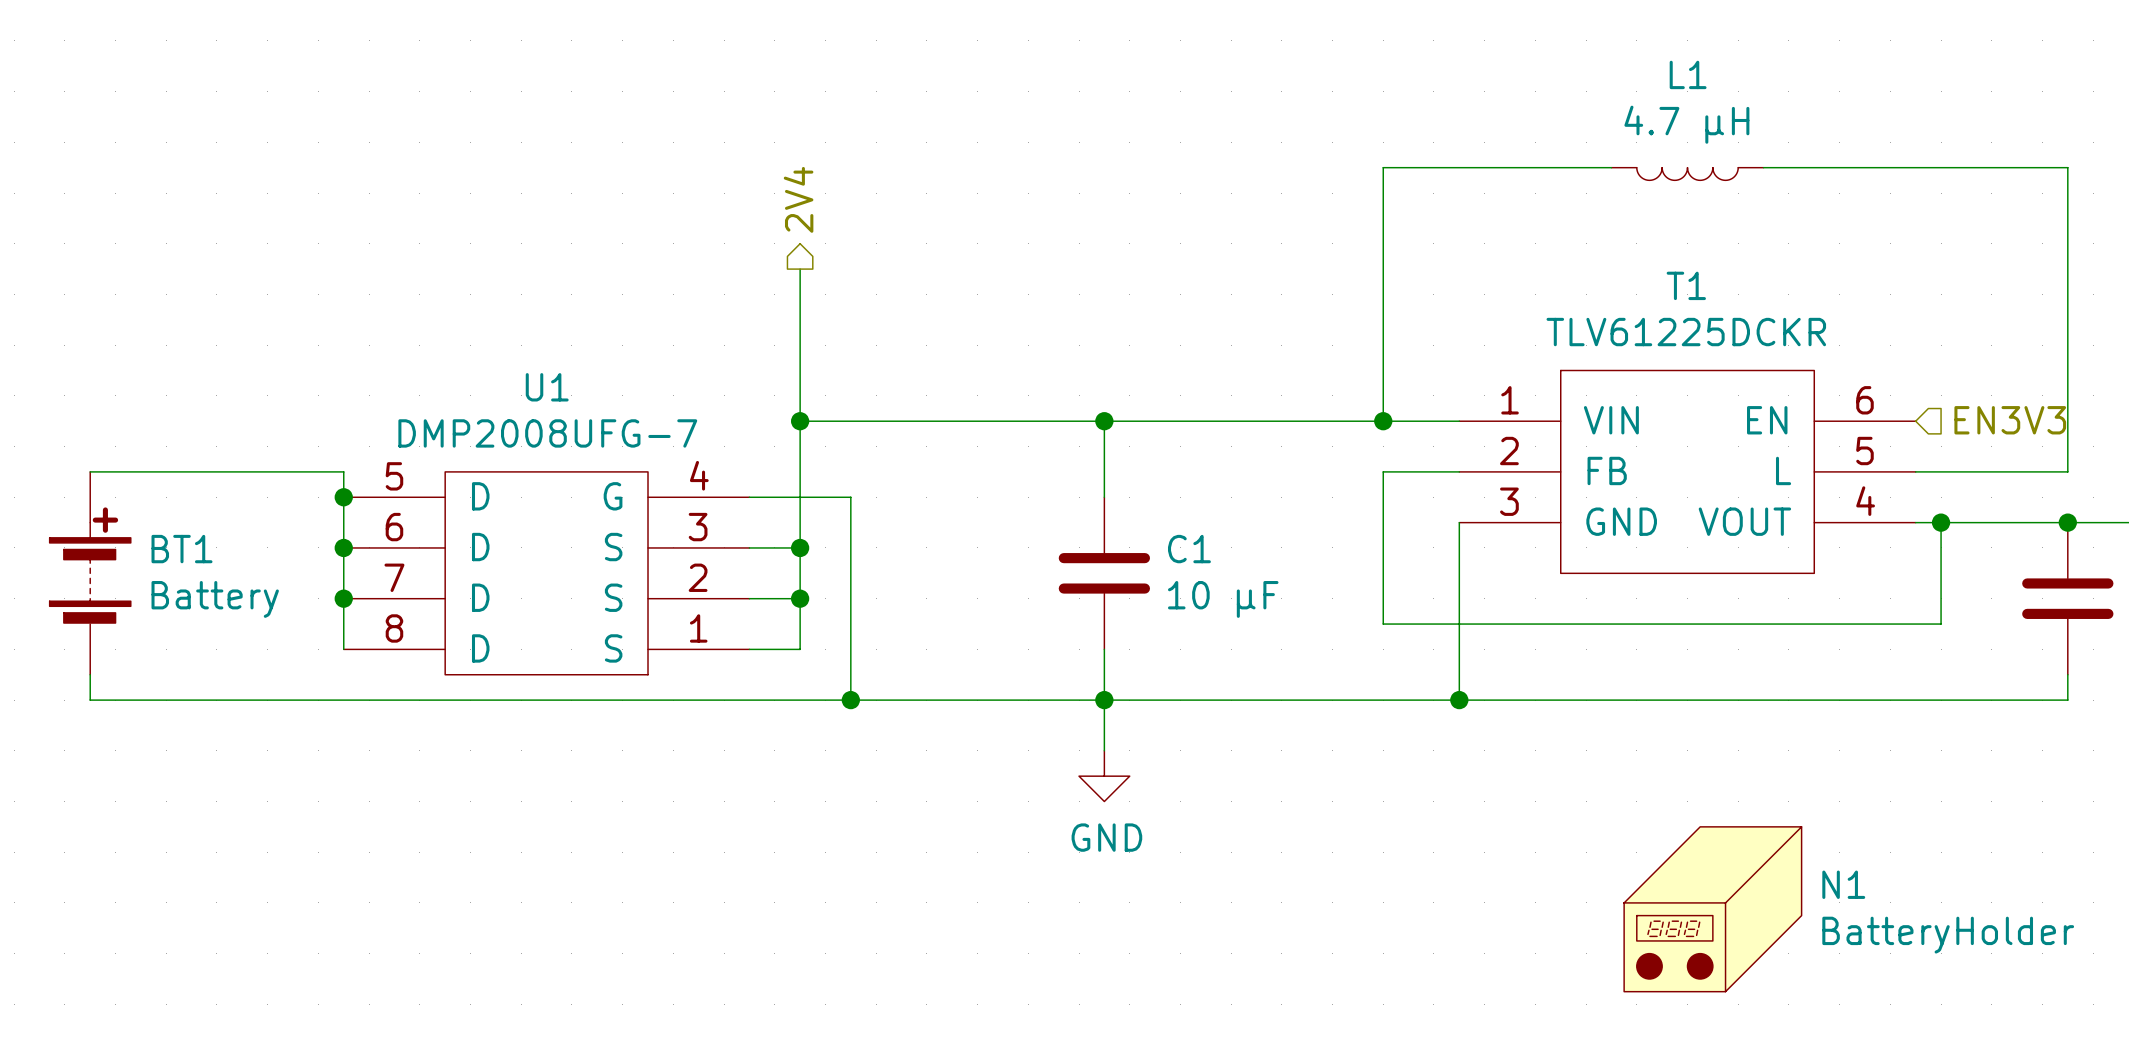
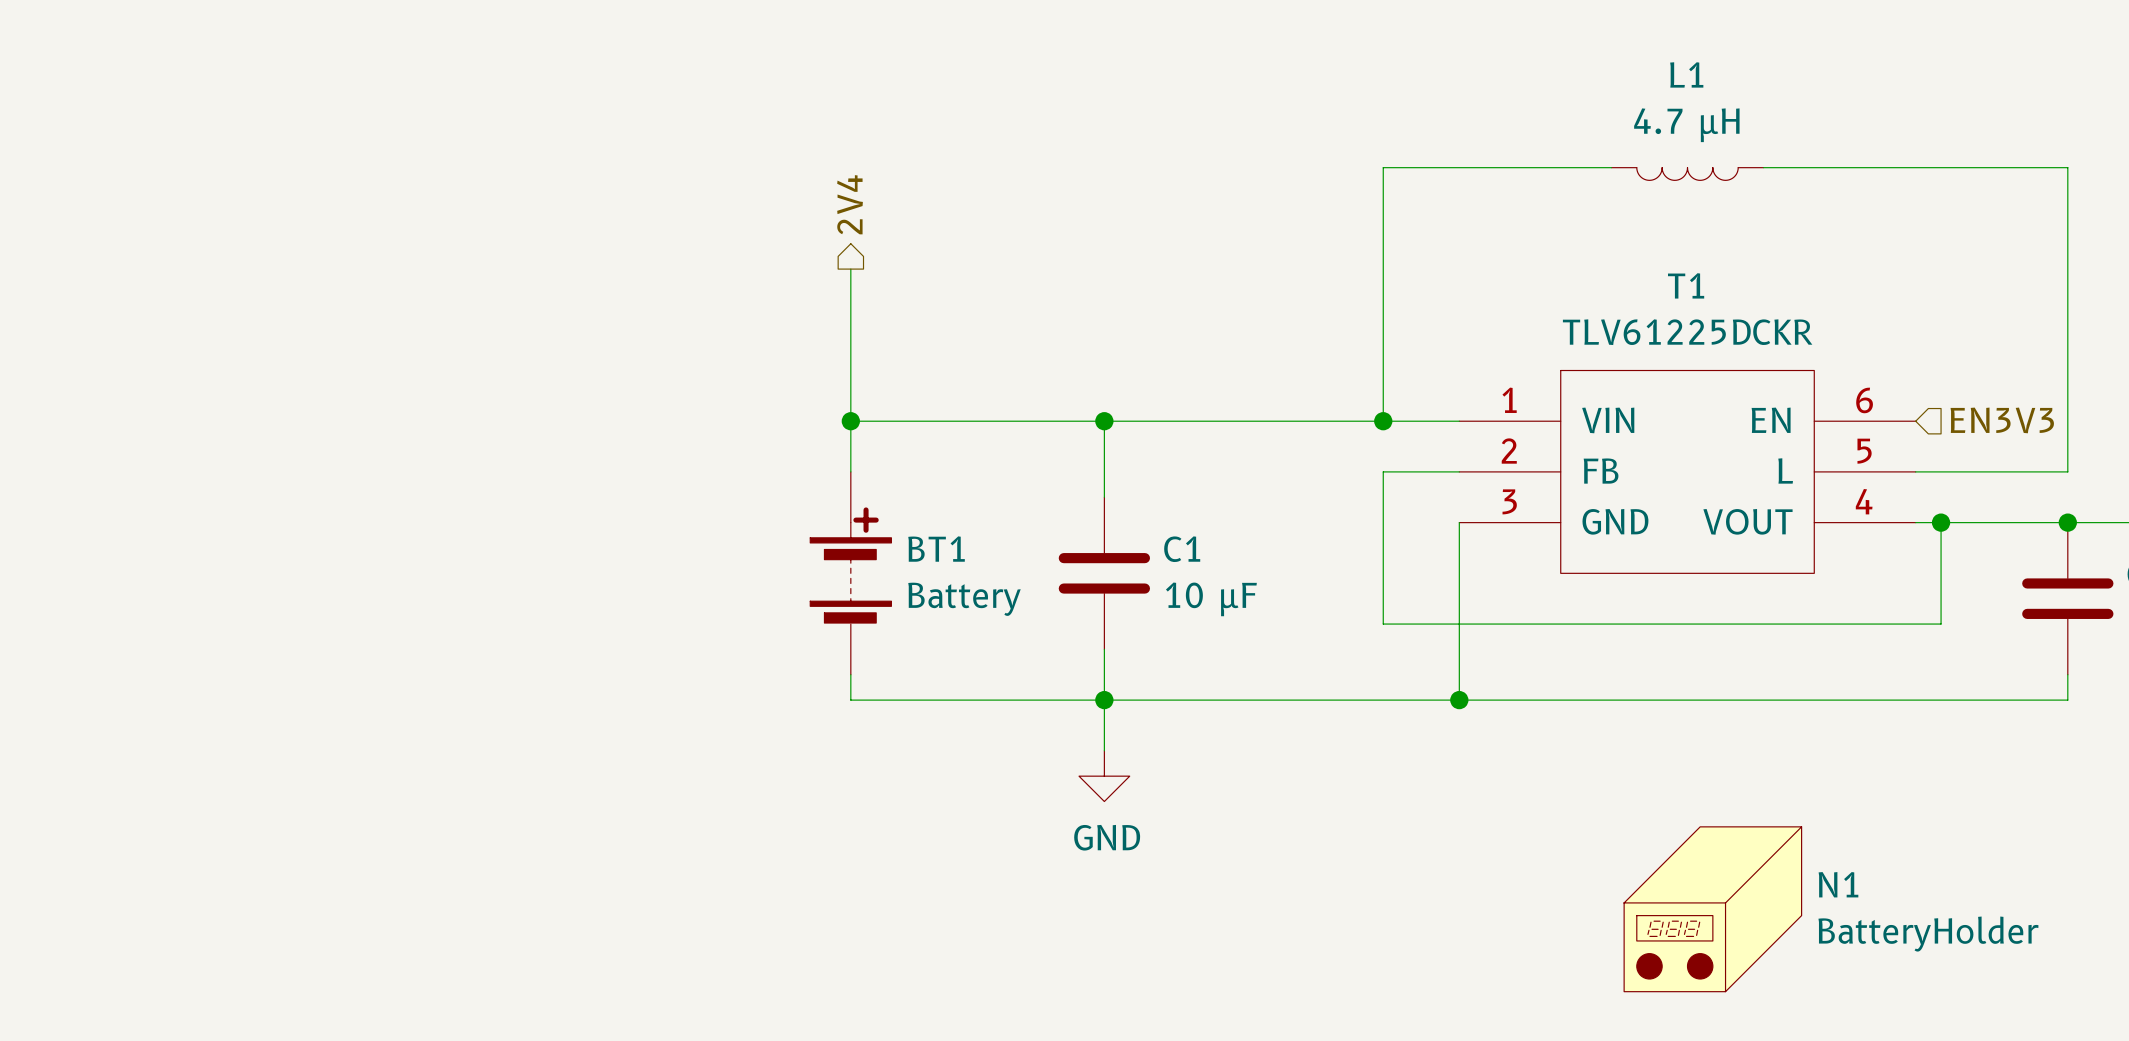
hierarchical label position: 2V4 (798, 199) -> 2V4 (850, 204)
wire: (800, 269) (800, 649) (749, 649) -> none
wire: none -> (850, 269) (850, 471)
wire: (800, 421) (850, 421) -> none
junction position: (800, 421) -> (850, 421)
wire: (90, 471) (343, 471) (343, 649) -> none
junction: (343, 497) -> none
wire: (749, 497) (850, 497) (850, 674) -> none
junction: (343, 547) -> none
wire: (749, 547) (800, 547) -> none
junction: (800, 547) -> none
BT1 position: (90, 573) -> (850, 573)
U1: DMP2008UFG-7 (546, 573) -> none
junction: (343, 598) -> none
wire: (749, 598) (800, 598) -> none
junction: (800, 598) -> none
wire: (90, 674) (90, 700) (850, 700) -> none
junction: (850, 700) -> none

